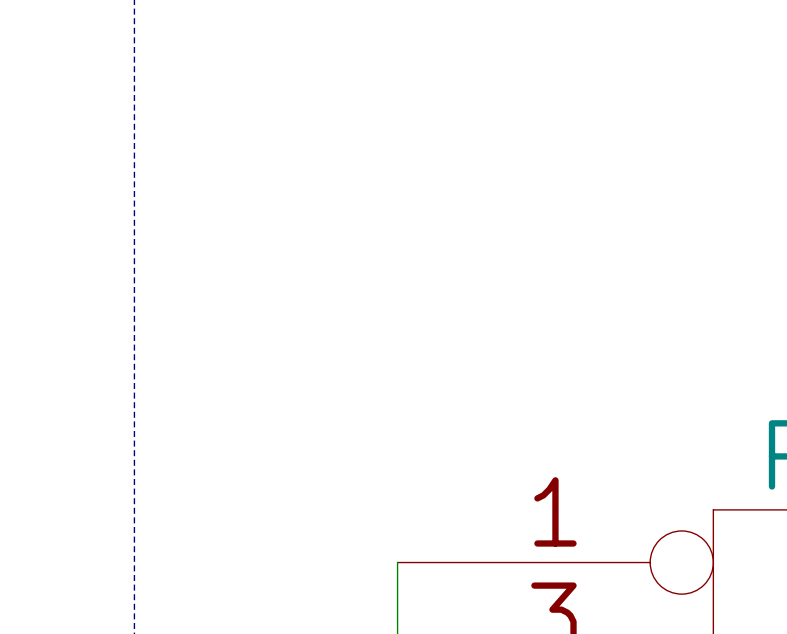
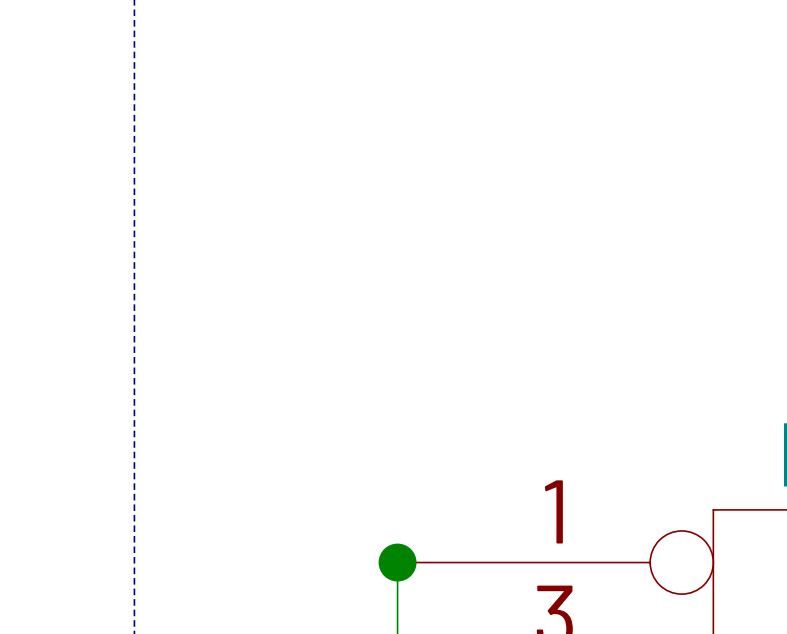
junction: none -> (397, 562)

